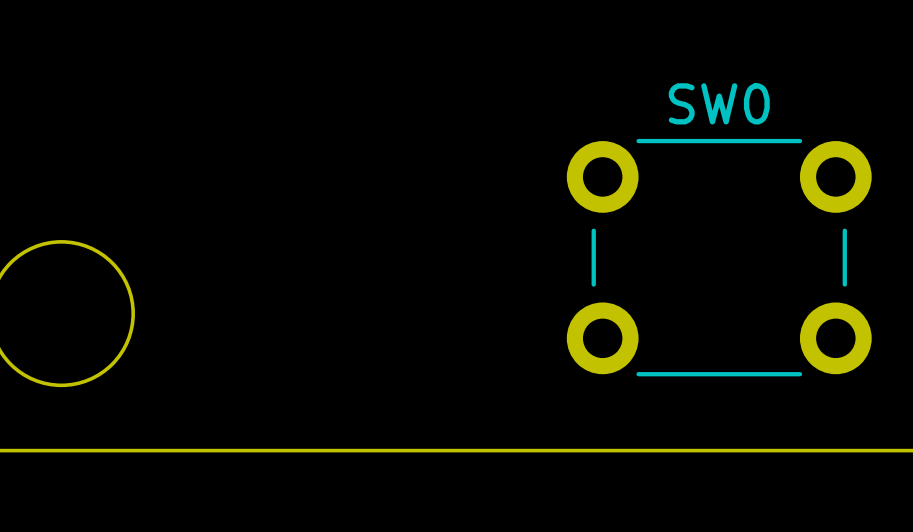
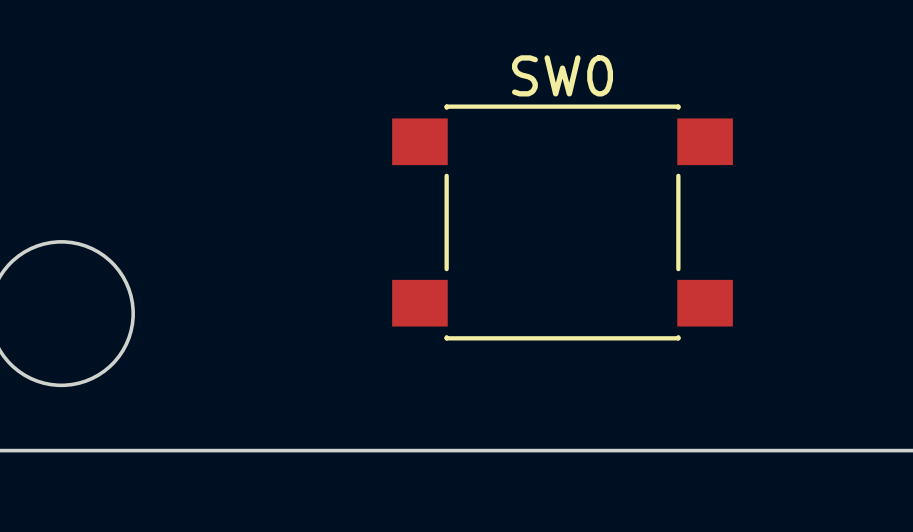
SW0 footprint: [566, 138, 872, 377] -> [392, 104, 733, 341]

